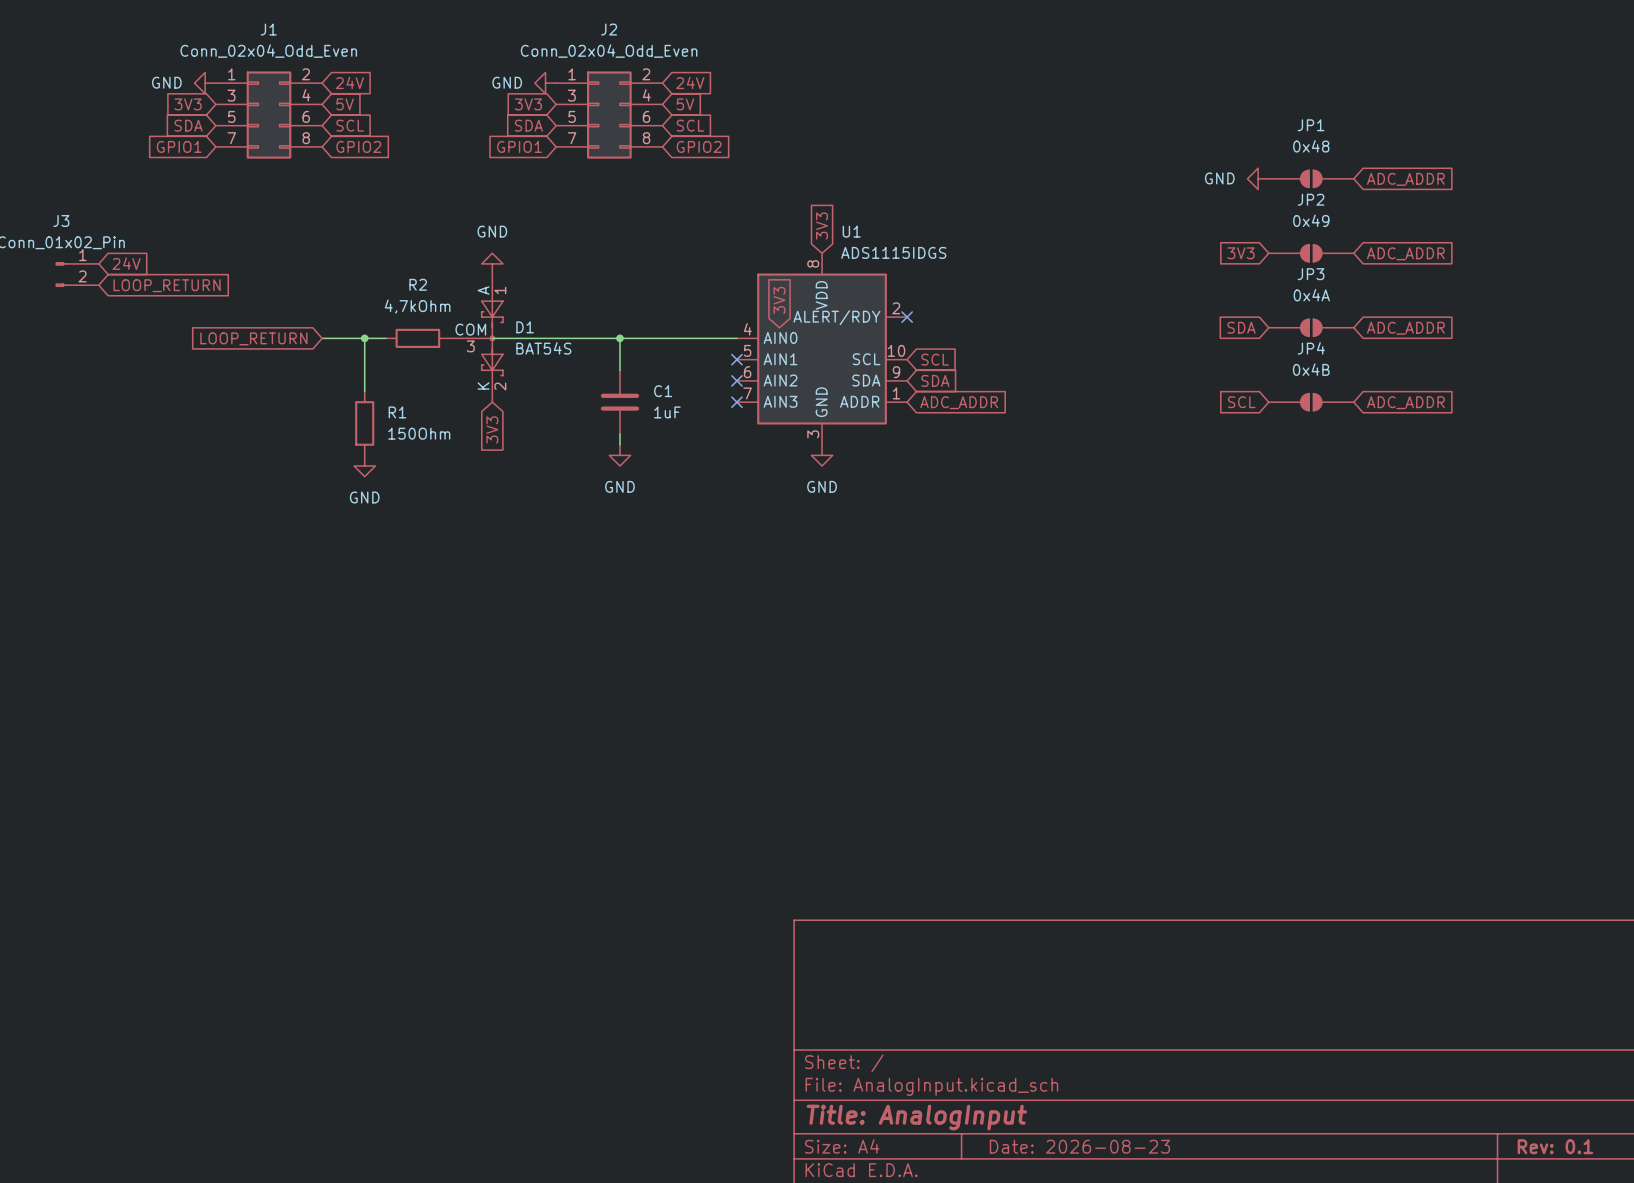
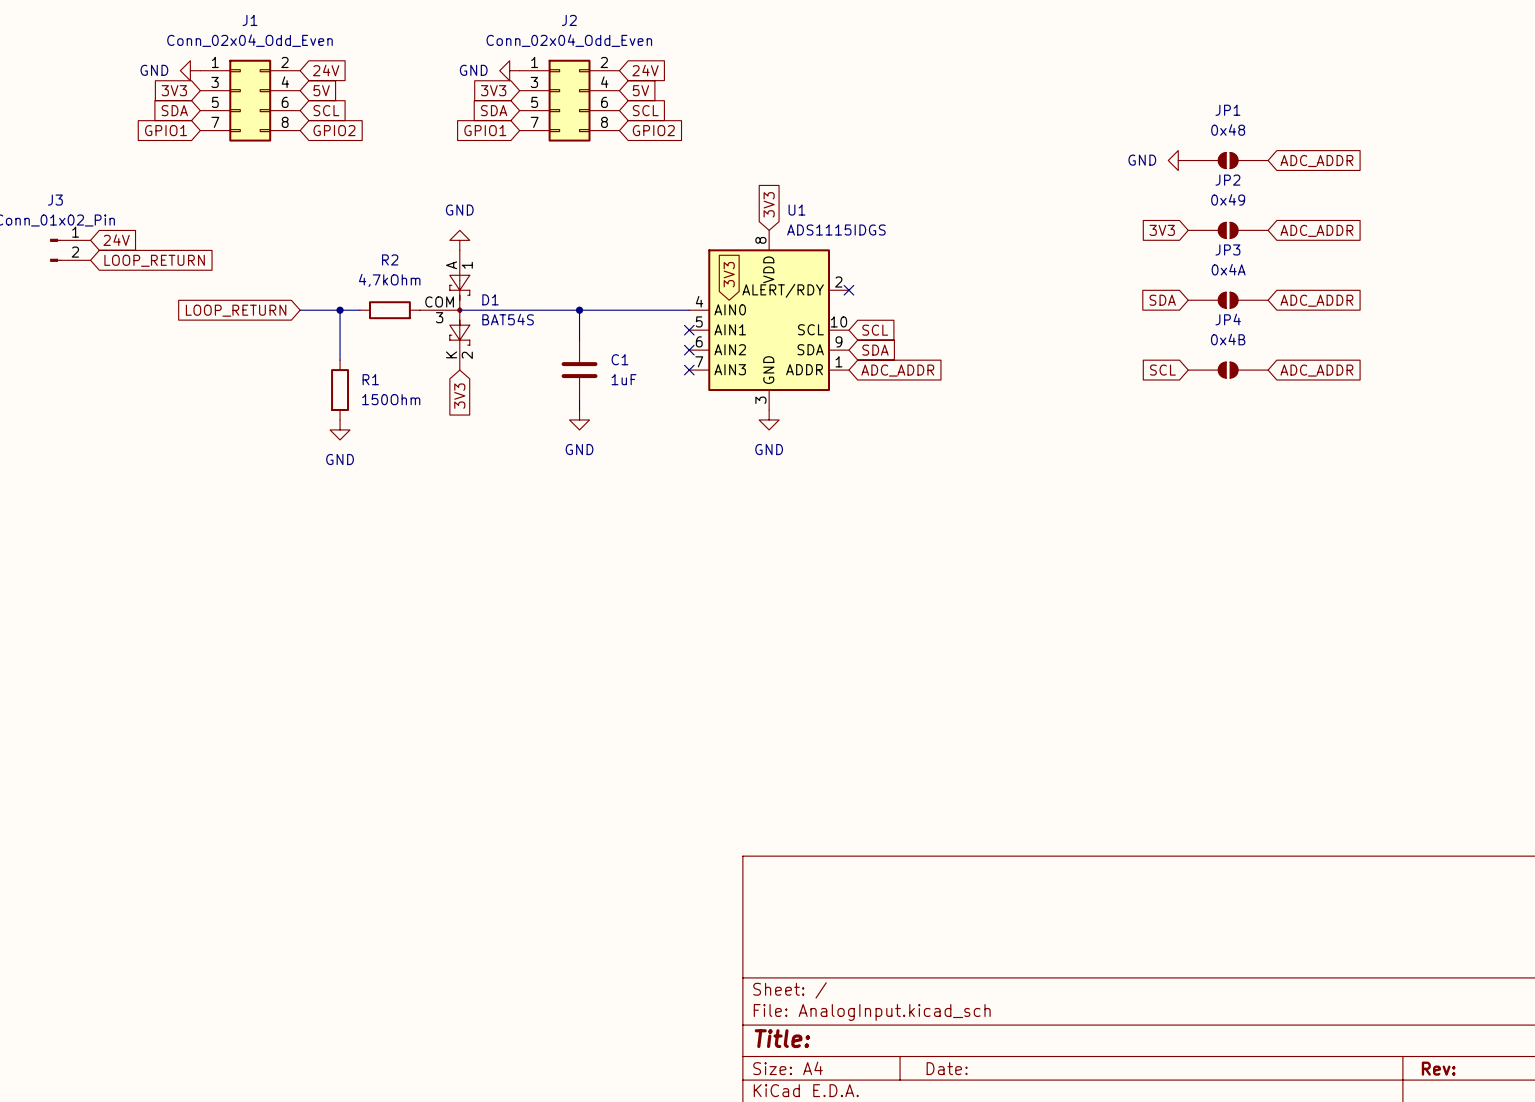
title block: Title: AnalogInput (916, 1117) -> Title: (782, 1038)
title block: Date: 2026-08-23 (1079, 1146) -> Date: (947, 1068)
title block: Rev: 0.1 (1555, 1146) -> Rev: (1438, 1068)

